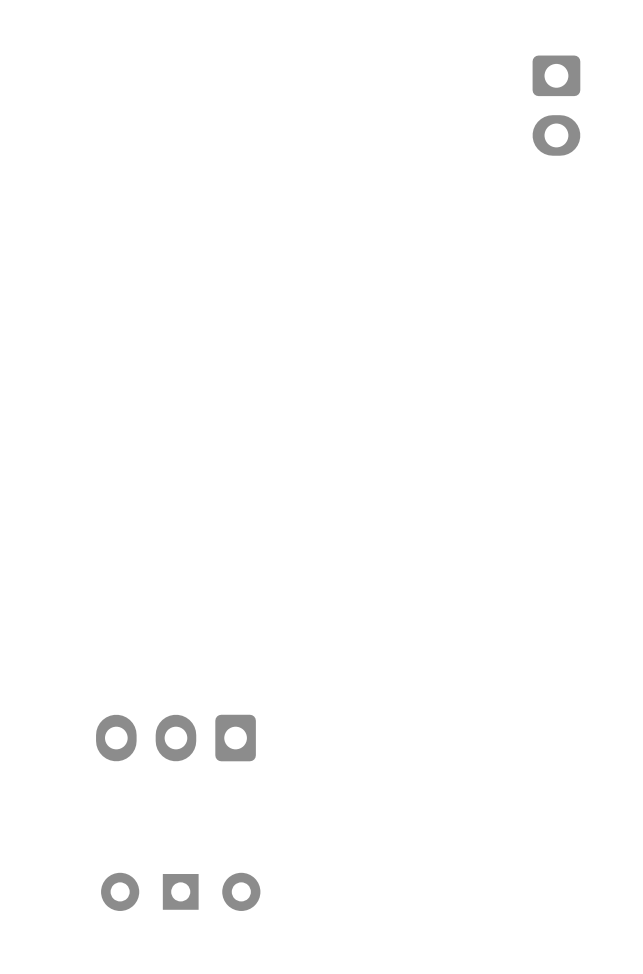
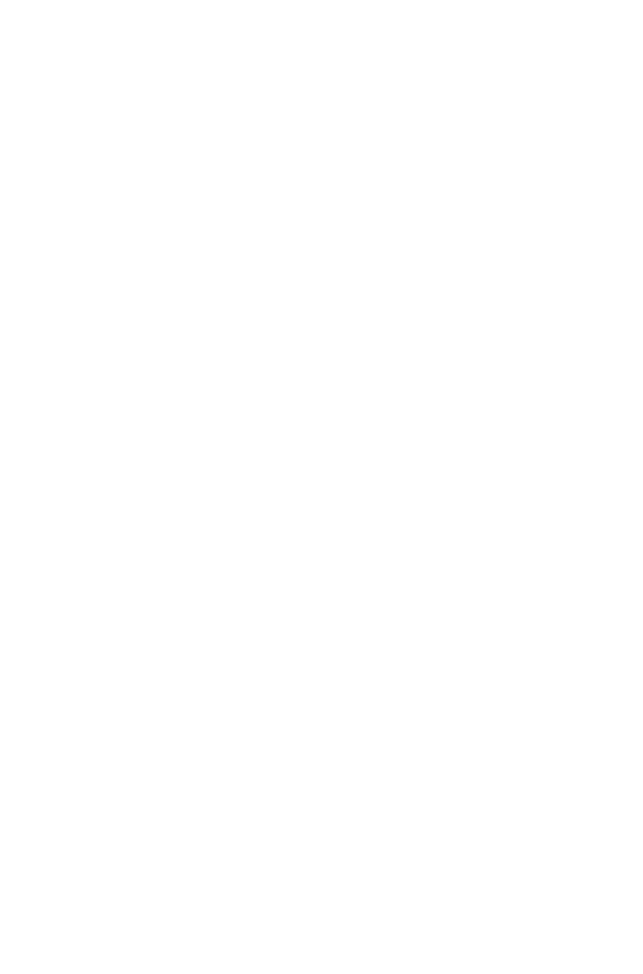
part: (556, 105) -> none
part: (175, 738) -> none
part: (180, 891) -> none

